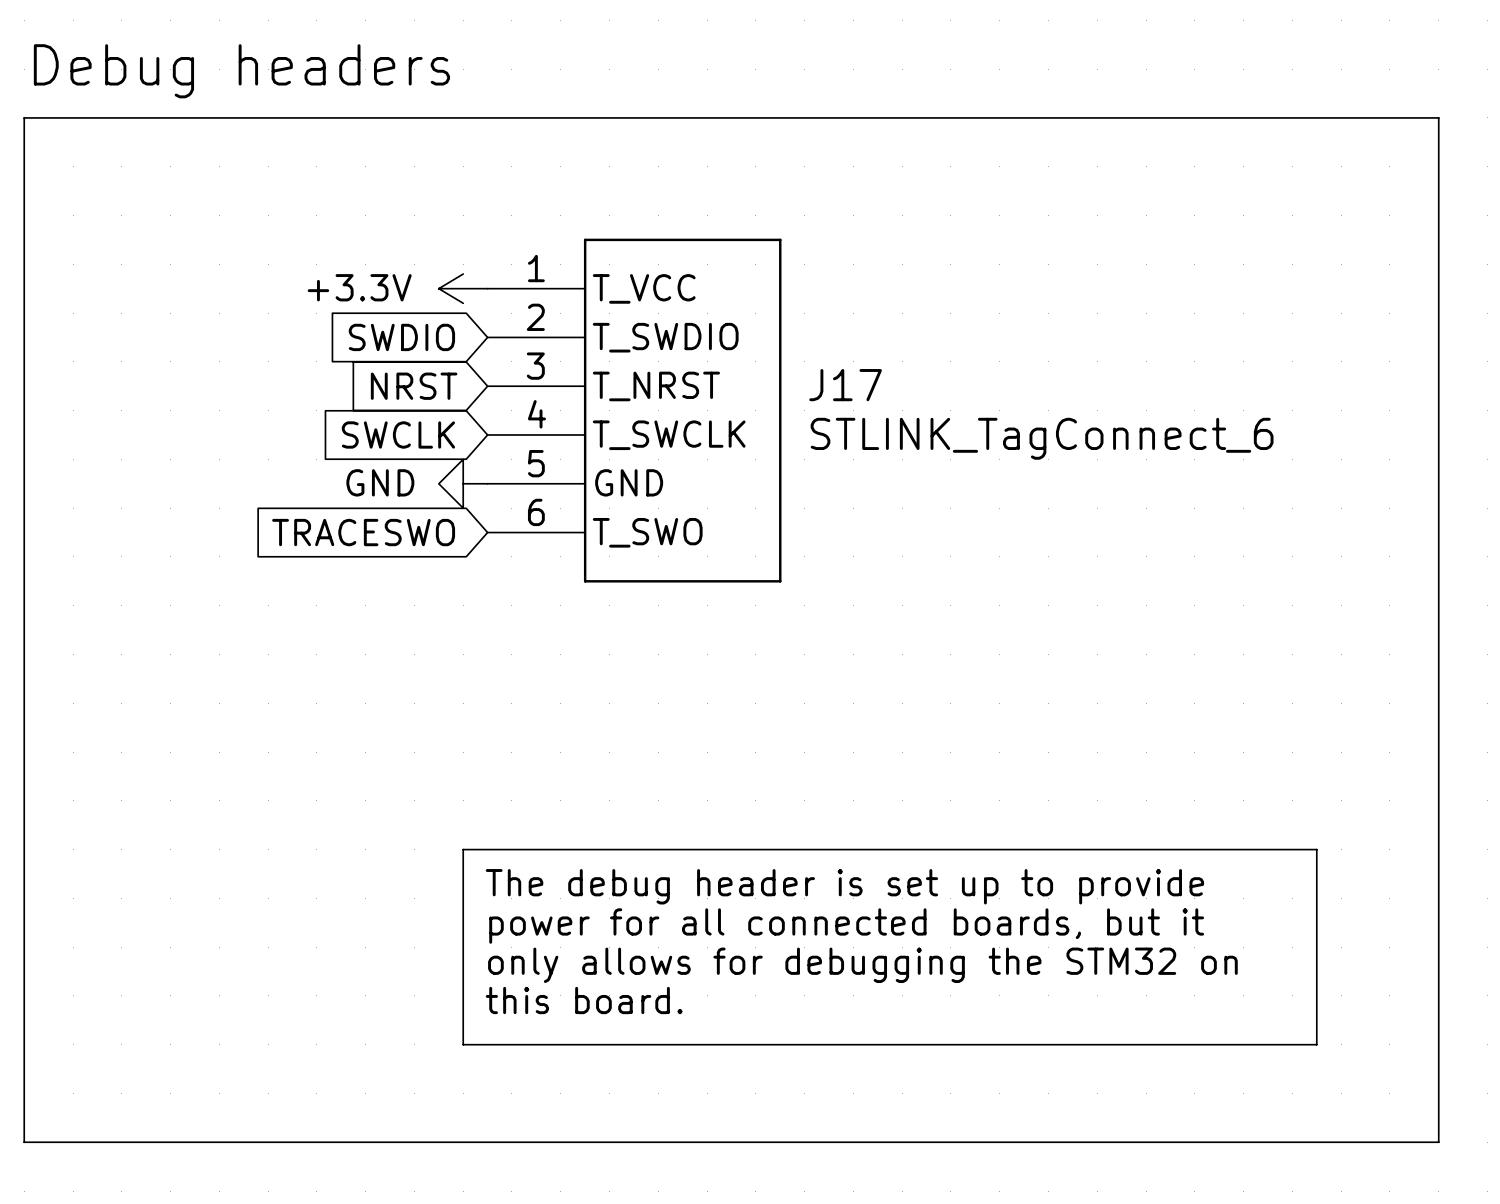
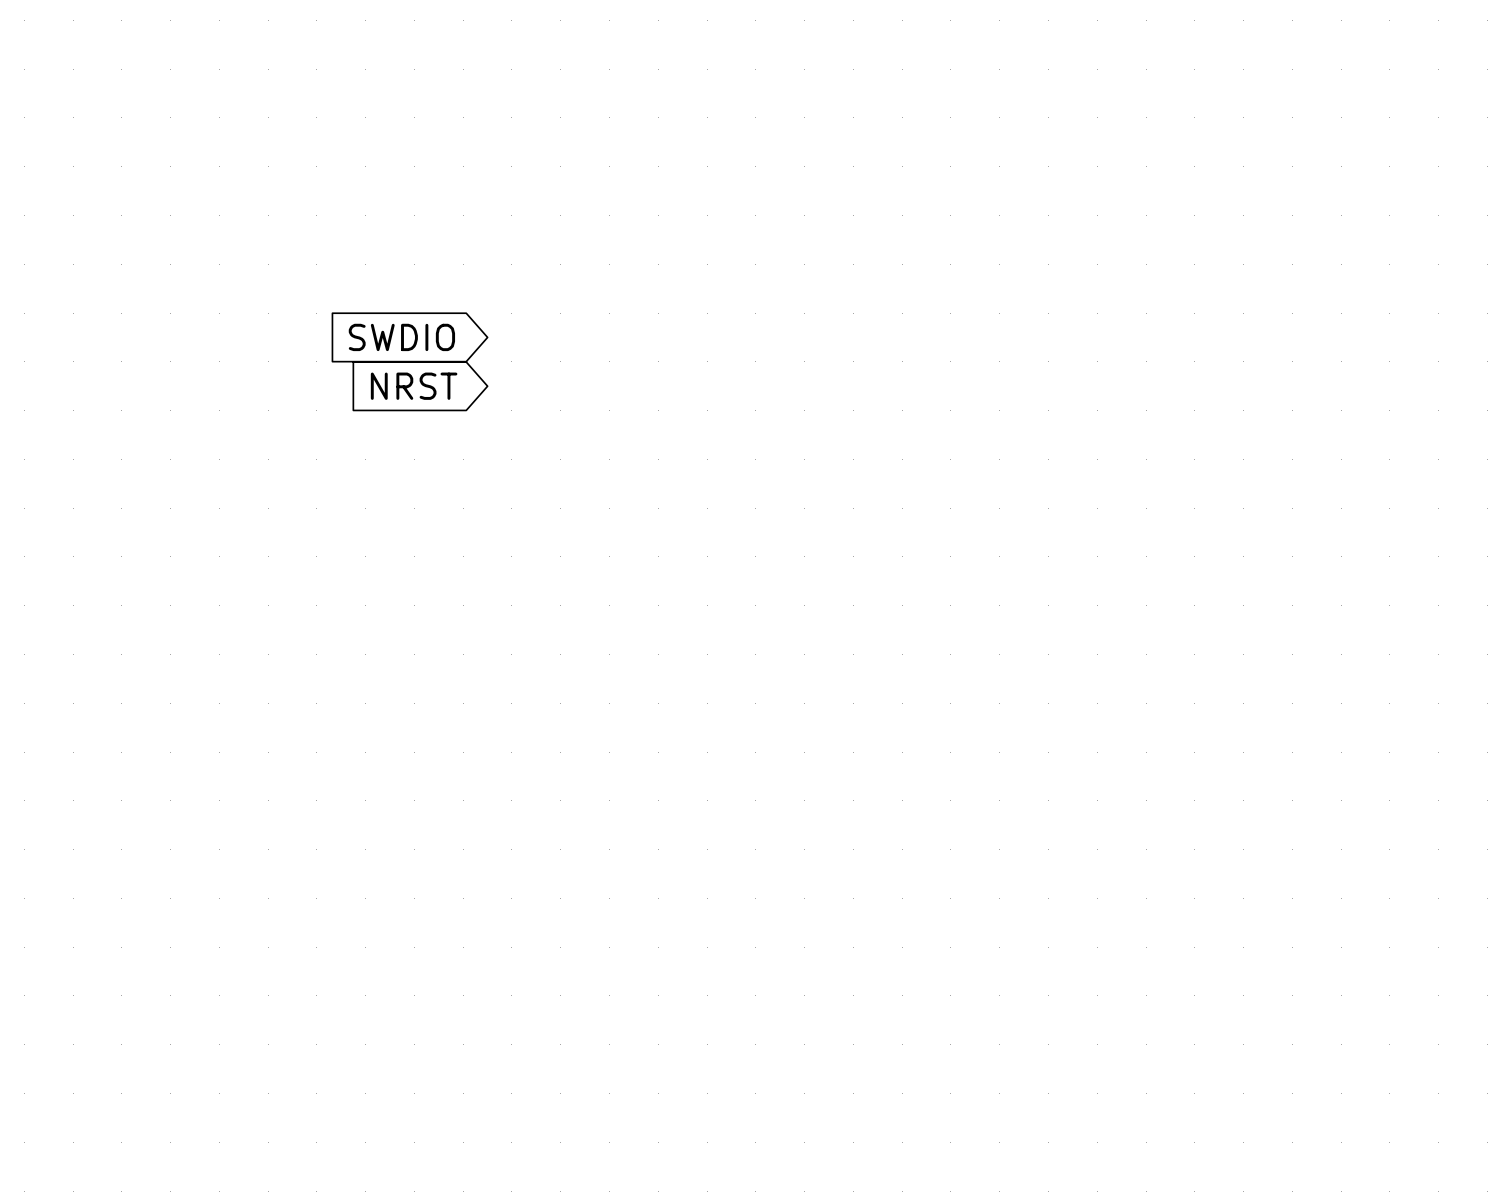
text: Debug headers (241, 71) -> none
line: (24, 117) (1438, 117) (1438, 1142) (24, 1142) (24, 117) -> none
power symbol: +3.3V (463, 288) -> none
J17: STLINK_TagConnect_6 (634, 410) -> none
global label: SWCLK (398, 434) -> none
power symbol: GND (463, 483) -> none
global label: TRACESWO (363, 532) -> none
line: (463, 849) (1316, 849) (1316, 1044) (463, 1044) (463, 849) -> none
text: The debug header is set up to provide (844, 886) -> none
text: power for all connected boards, but it (846, 926) -> none
text: only allows for debugging the STM32 on (862, 965) -> none
text: this board. (584, 1000) -> none

